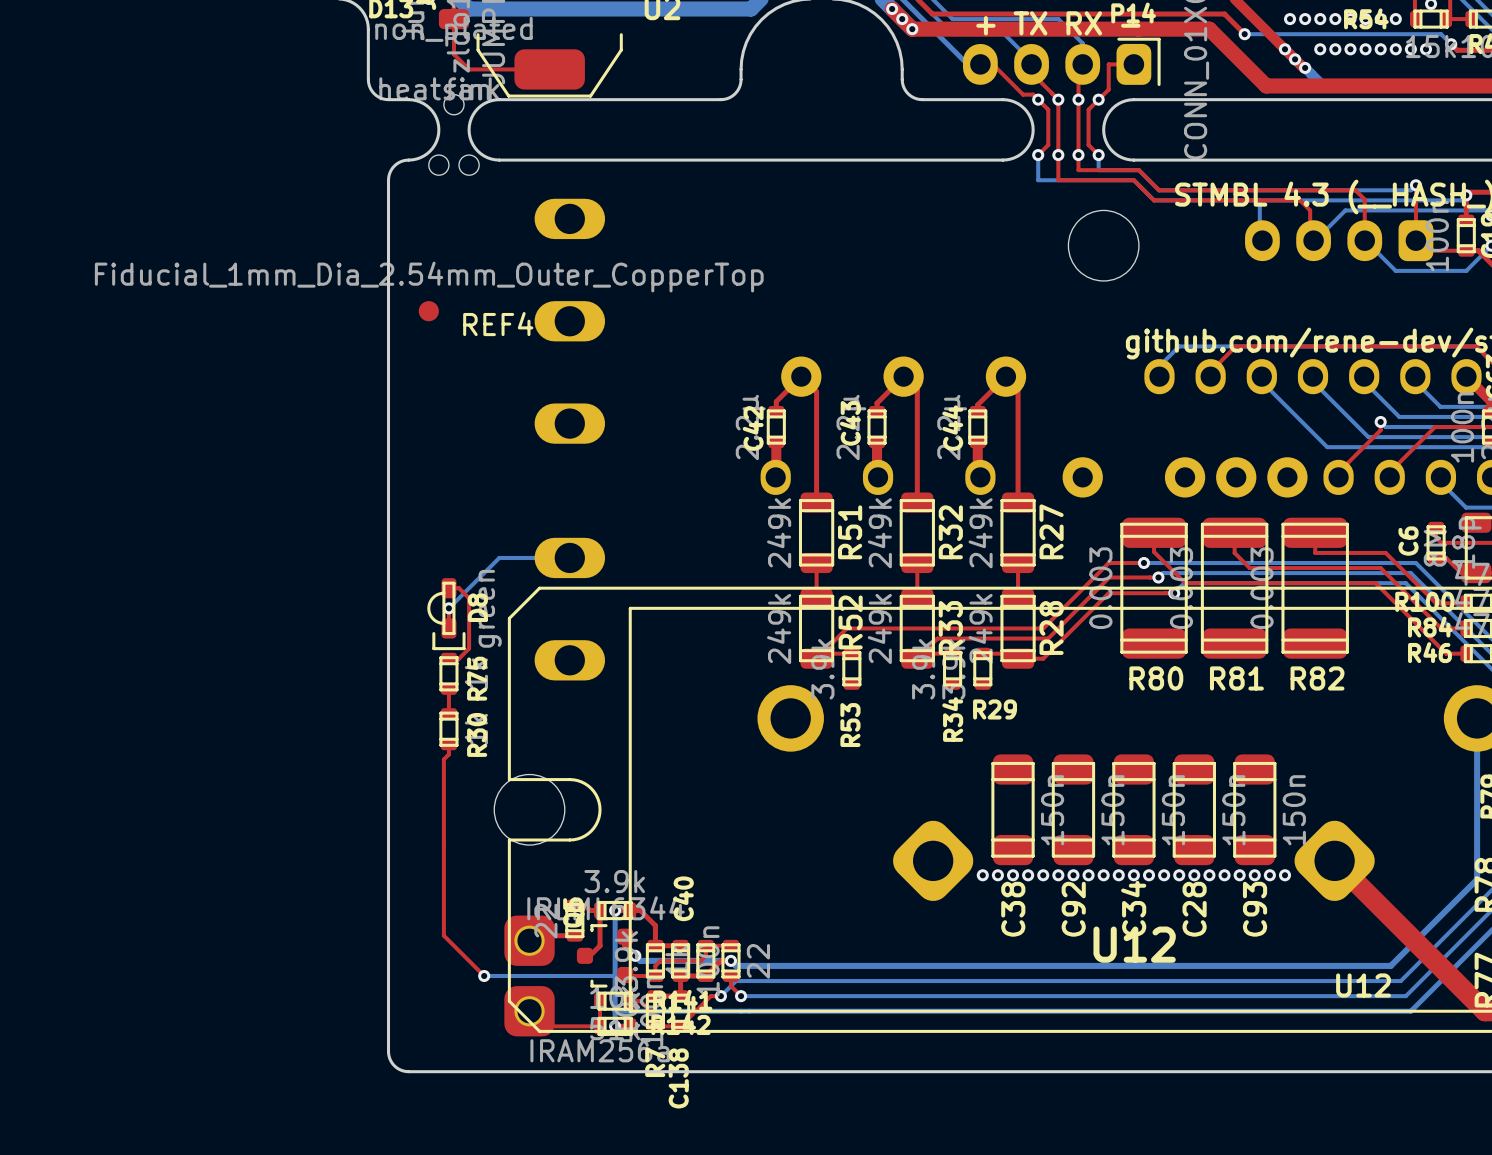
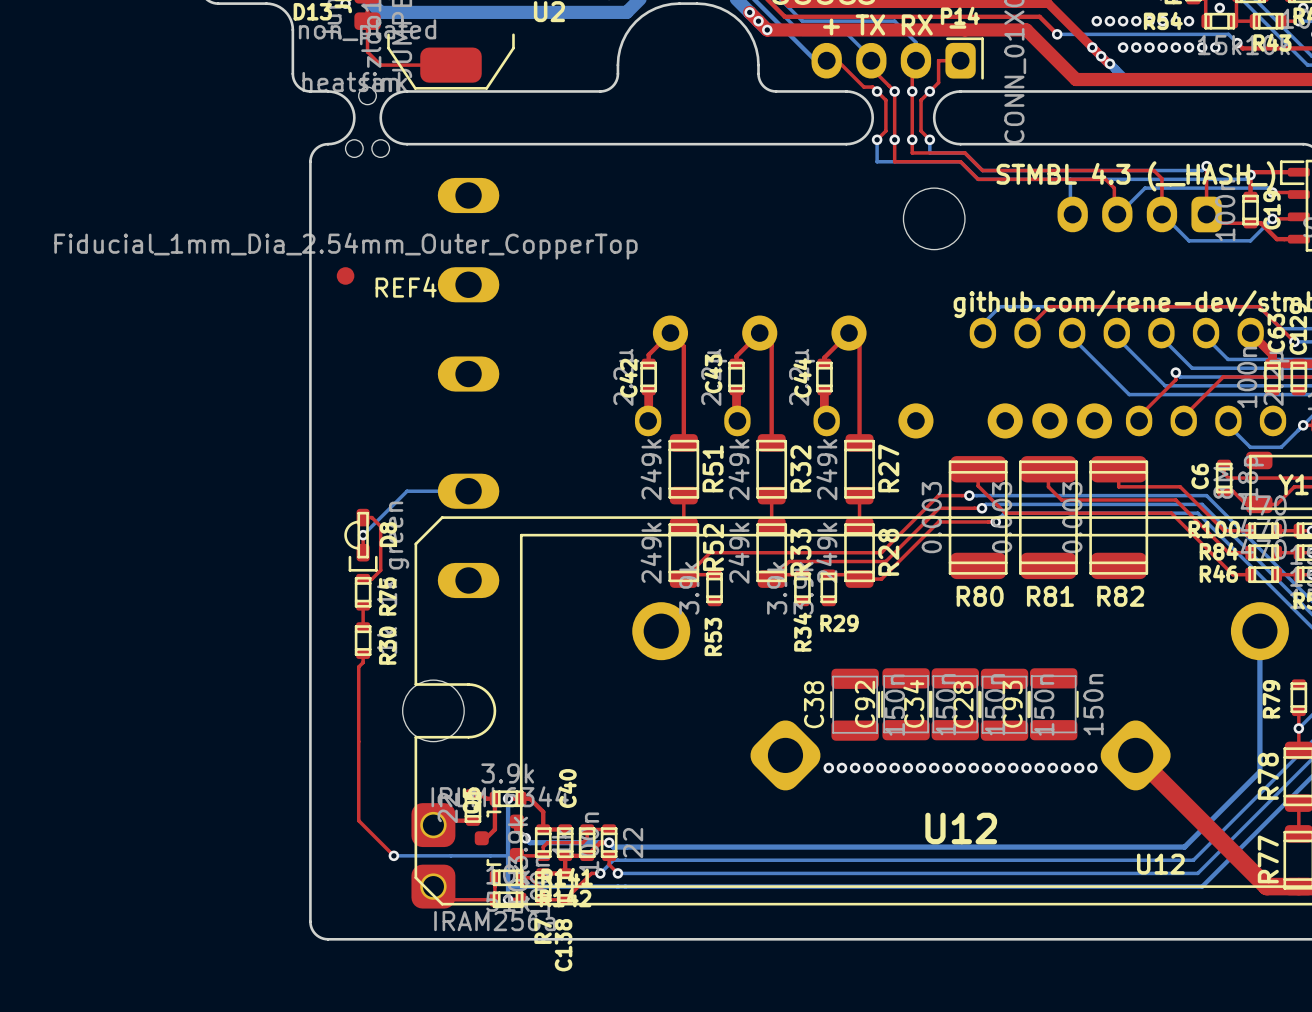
C38 footprint: [991, 754, 1035, 866] -> [830, 668, 881, 741]
C92 footprint: [1051, 754, 1096, 866] -> [881, 668, 932, 741]
C34 footprint: [1112, 754, 1156, 866] -> [930, 668, 981, 741]
C28 footprint: [1172, 754, 1216, 866] -> [979, 668, 1030, 741]
C93 footprint: [1233, 754, 1277, 866] -> [1028, 668, 1079, 741]
C34 name position: C34 (1133, 908) -> C34 (913, 703)
C38 name position: C38 (1013, 909) -> C38 (814, 704)
C92 name position: C92 (1073, 909) -> C92 (865, 704)
C28 name position: C28 (1194, 909) -> C28 (963, 704)
C93 name position: C93 (1255, 909) -> C93 (1012, 704)

